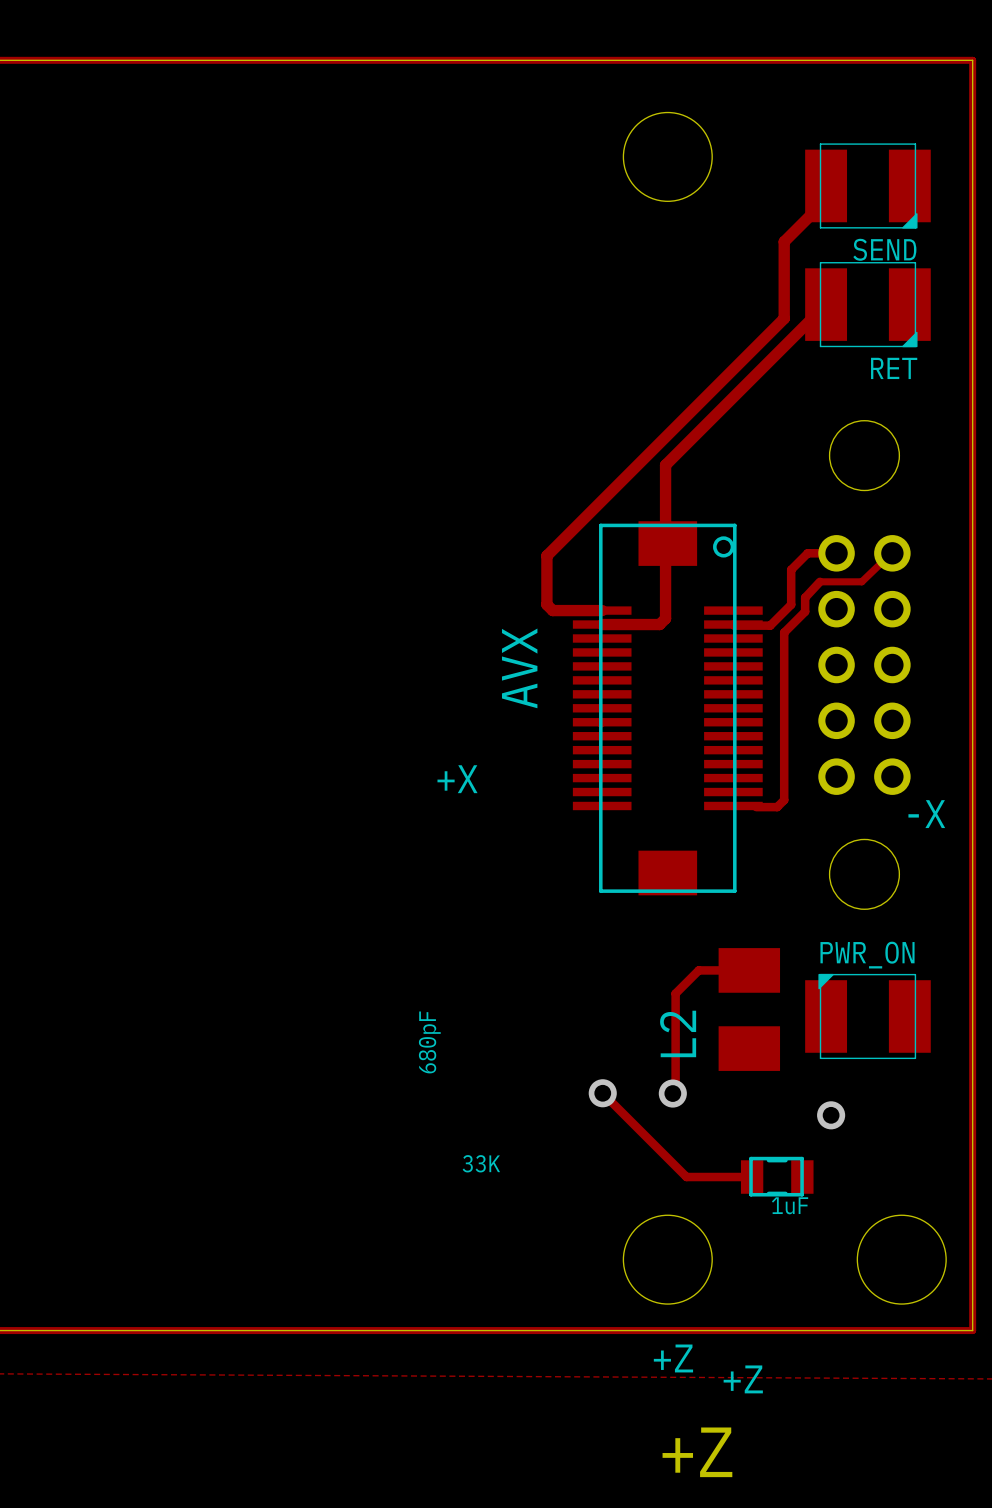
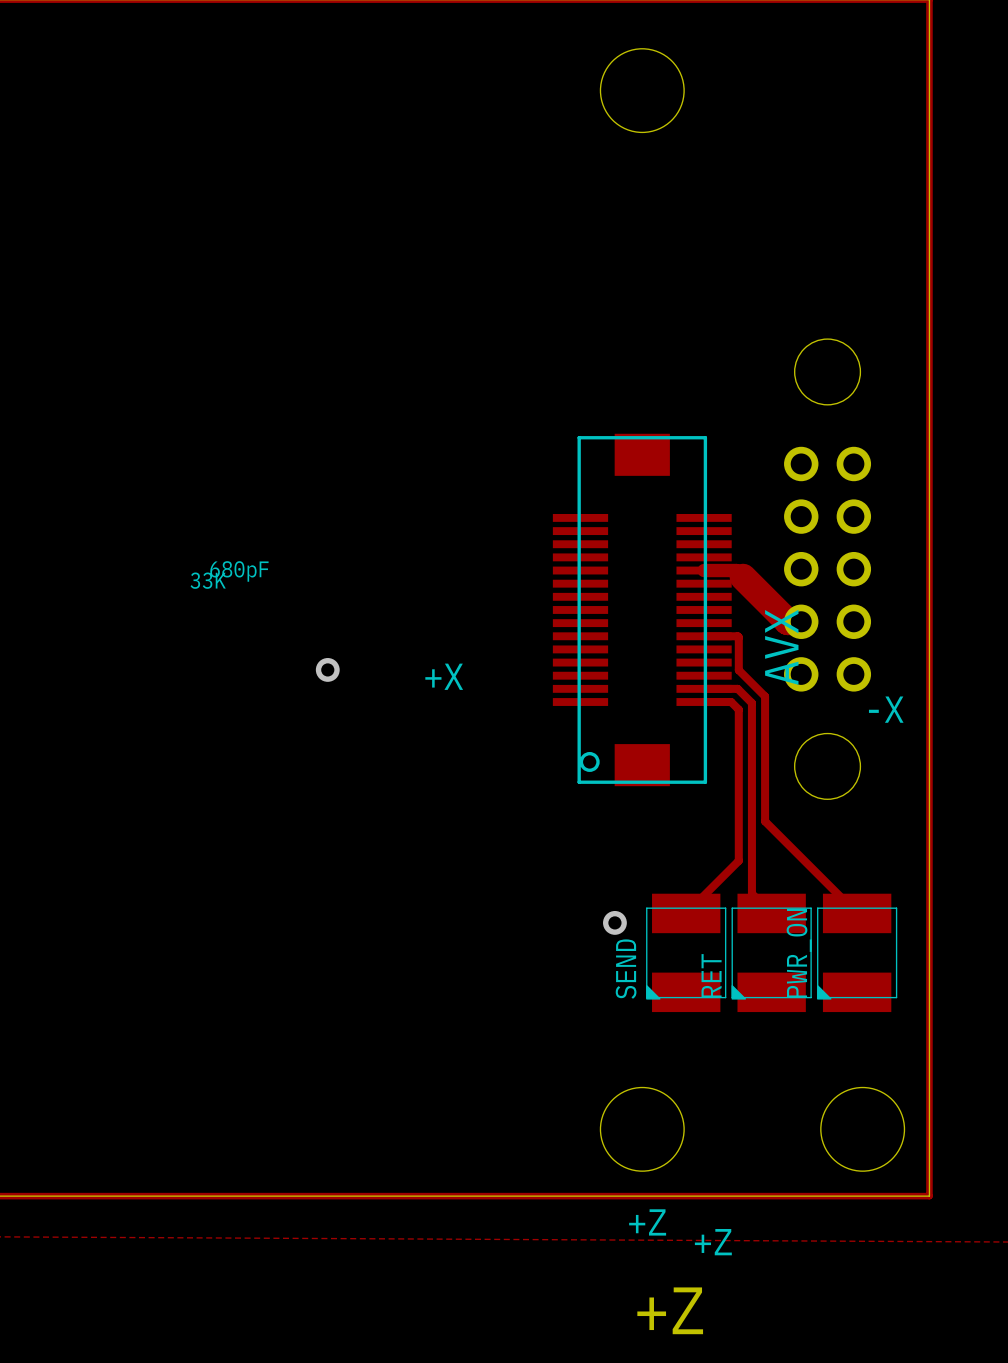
SEND: (867, 185) -> none
track: (826, 199) (784, 241) (784, 318) (546, 555) (546, 604) (552, 610) (602, 610) -> none
track: (826, 304) (665, 465) (665, 618) (659, 624) (602, 624) -> none
RET: (867, 304) -> none
track: (836, 553) (807, 553) (791, 569) (791, 604) (770, 625) (733, 624) -> none
track: (892, 553) (861, 581) (819, 581) (805, 597) (805, 611) (784, 632) (784, 800) (777, 807) (756, 807) -> none
track: none -> (704, 570) (736, 570) (787, 621) (801, 621)
AVX rotation: 0° (667, 708) -> 180° (642, 609)
track: none -> (704, 636) (737, 636) (738, 670) (765, 696) (765, 821) (857, 913)
via: none -> (327, 669)
track: none -> (704, 688) (737, 688) (751, 703) (751, 893) (771, 913)
track: none -> (704, 702) (731, 702) (738, 709) (738, 860) (686, 913)
track: (749, 970) (698, 970) (675, 993) (675, 1085) (672, 1093) -> none
L2: (749, 1009) -> none
PWR_ON rotation: 0° (867, 1016) -> 90° counterclockwise (857, 952)
via: none -> (614, 922)
part position: (429, 1042) -> (239, 571)
part value rotation: 0° (429, 1042) -> 90° clockwise (239, 571)
SEND: none -> (686, 952)
RET: none -> (771, 952)
track: (602, 1093) (686, 1177) (752, 1177) -> none
via: (602, 1093) -> none
via: (672, 1093) -> none
via: (831, 1115) -> none
part position: (481, 1163) -> (208, 580)
part: 1uF (777, 1176) -> none

